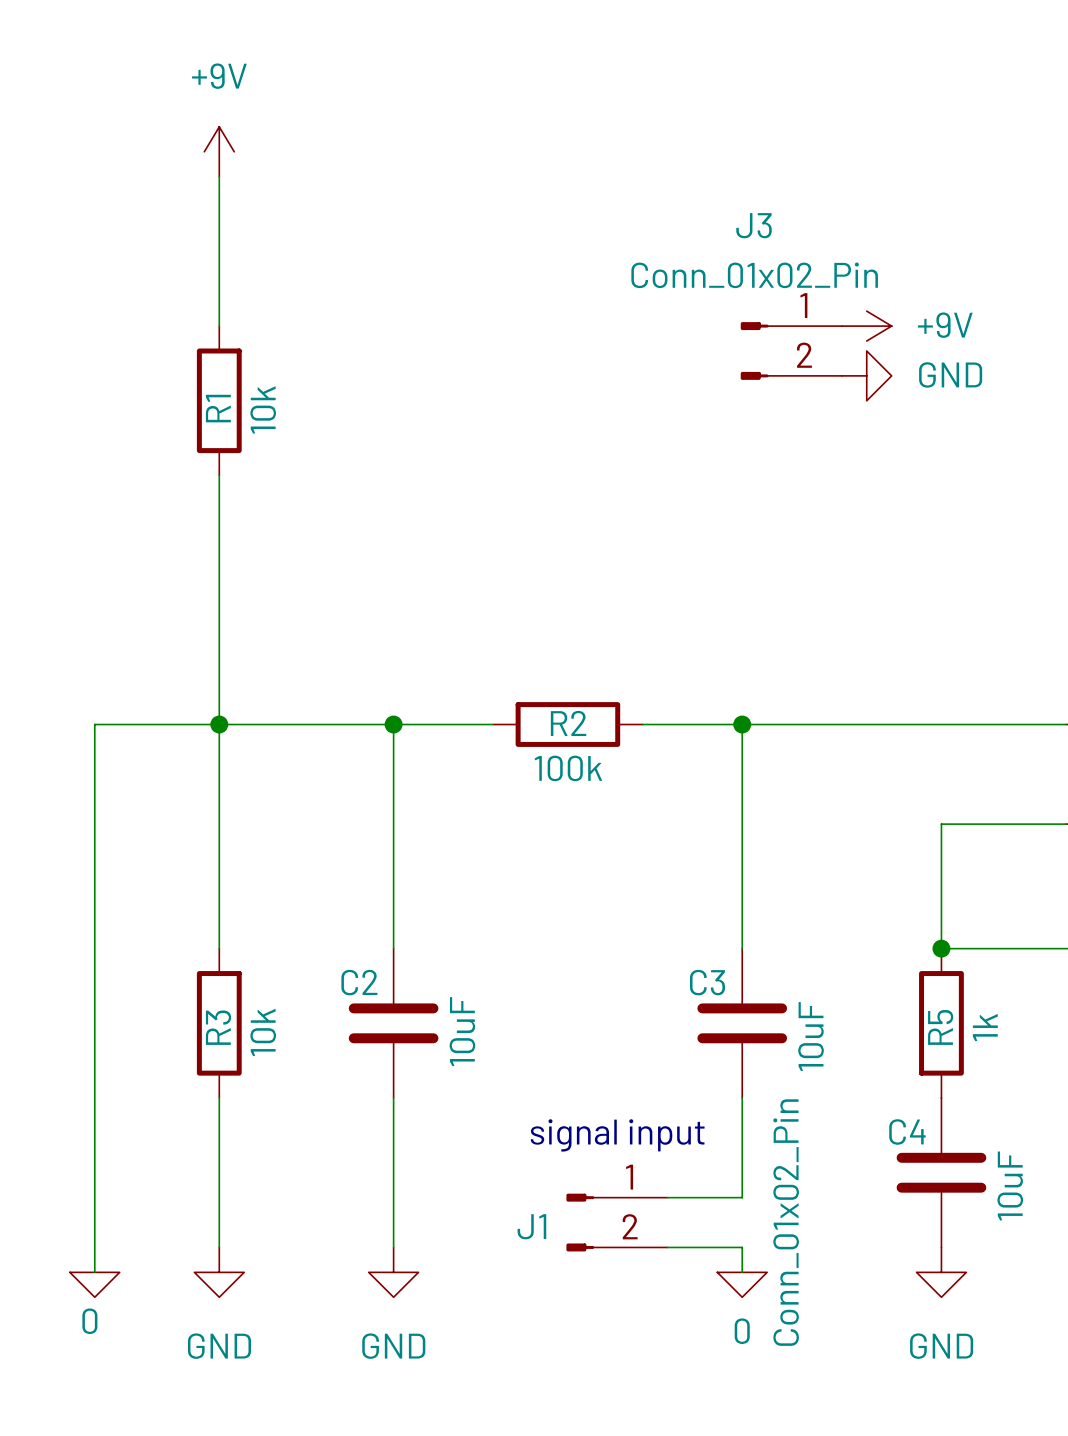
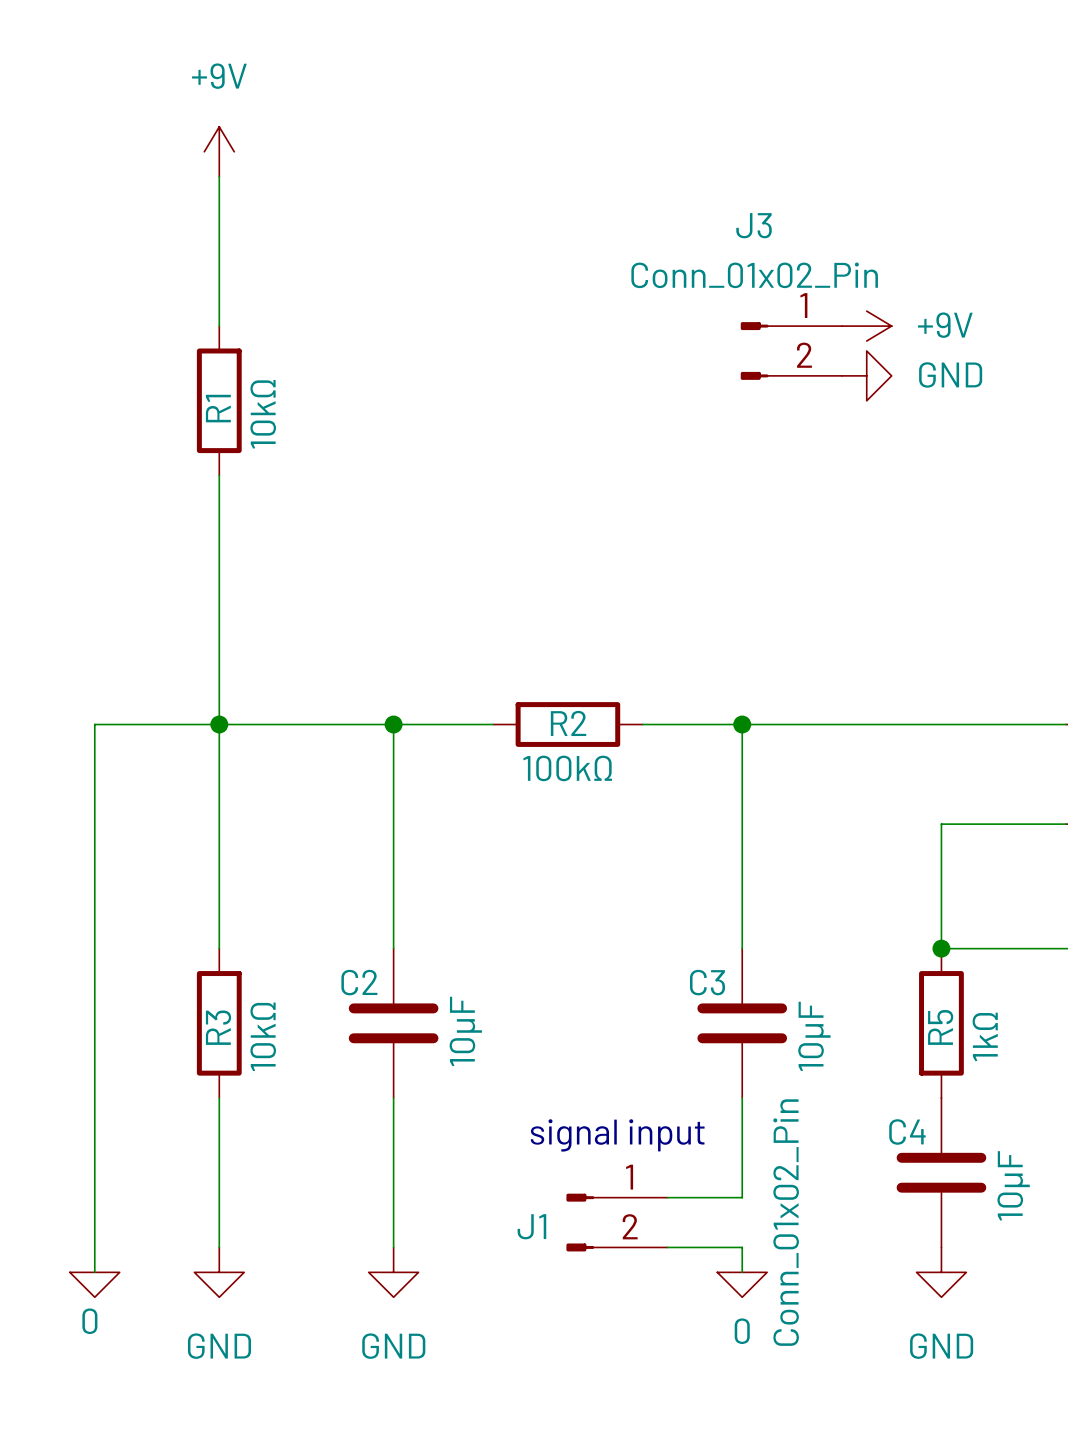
R1 value: 10k (263, 409) -> 10kΩ (263, 414)
R2 value: 100k (568, 768) -> 100kΩ (567, 768)
R5 value: 1k (985, 1027) -> 1kΩ (985, 1036)
C2 value: 10uF (462, 1031) -> 10µF (465, 1031)
R3 value: 10k (263, 1032) -> 10kΩ (263, 1036)
C3 value: 10uF (811, 1036) -> 10µF (814, 1036)
C4 value: 10uF (1010, 1186) -> 10µF (1013, 1185)

